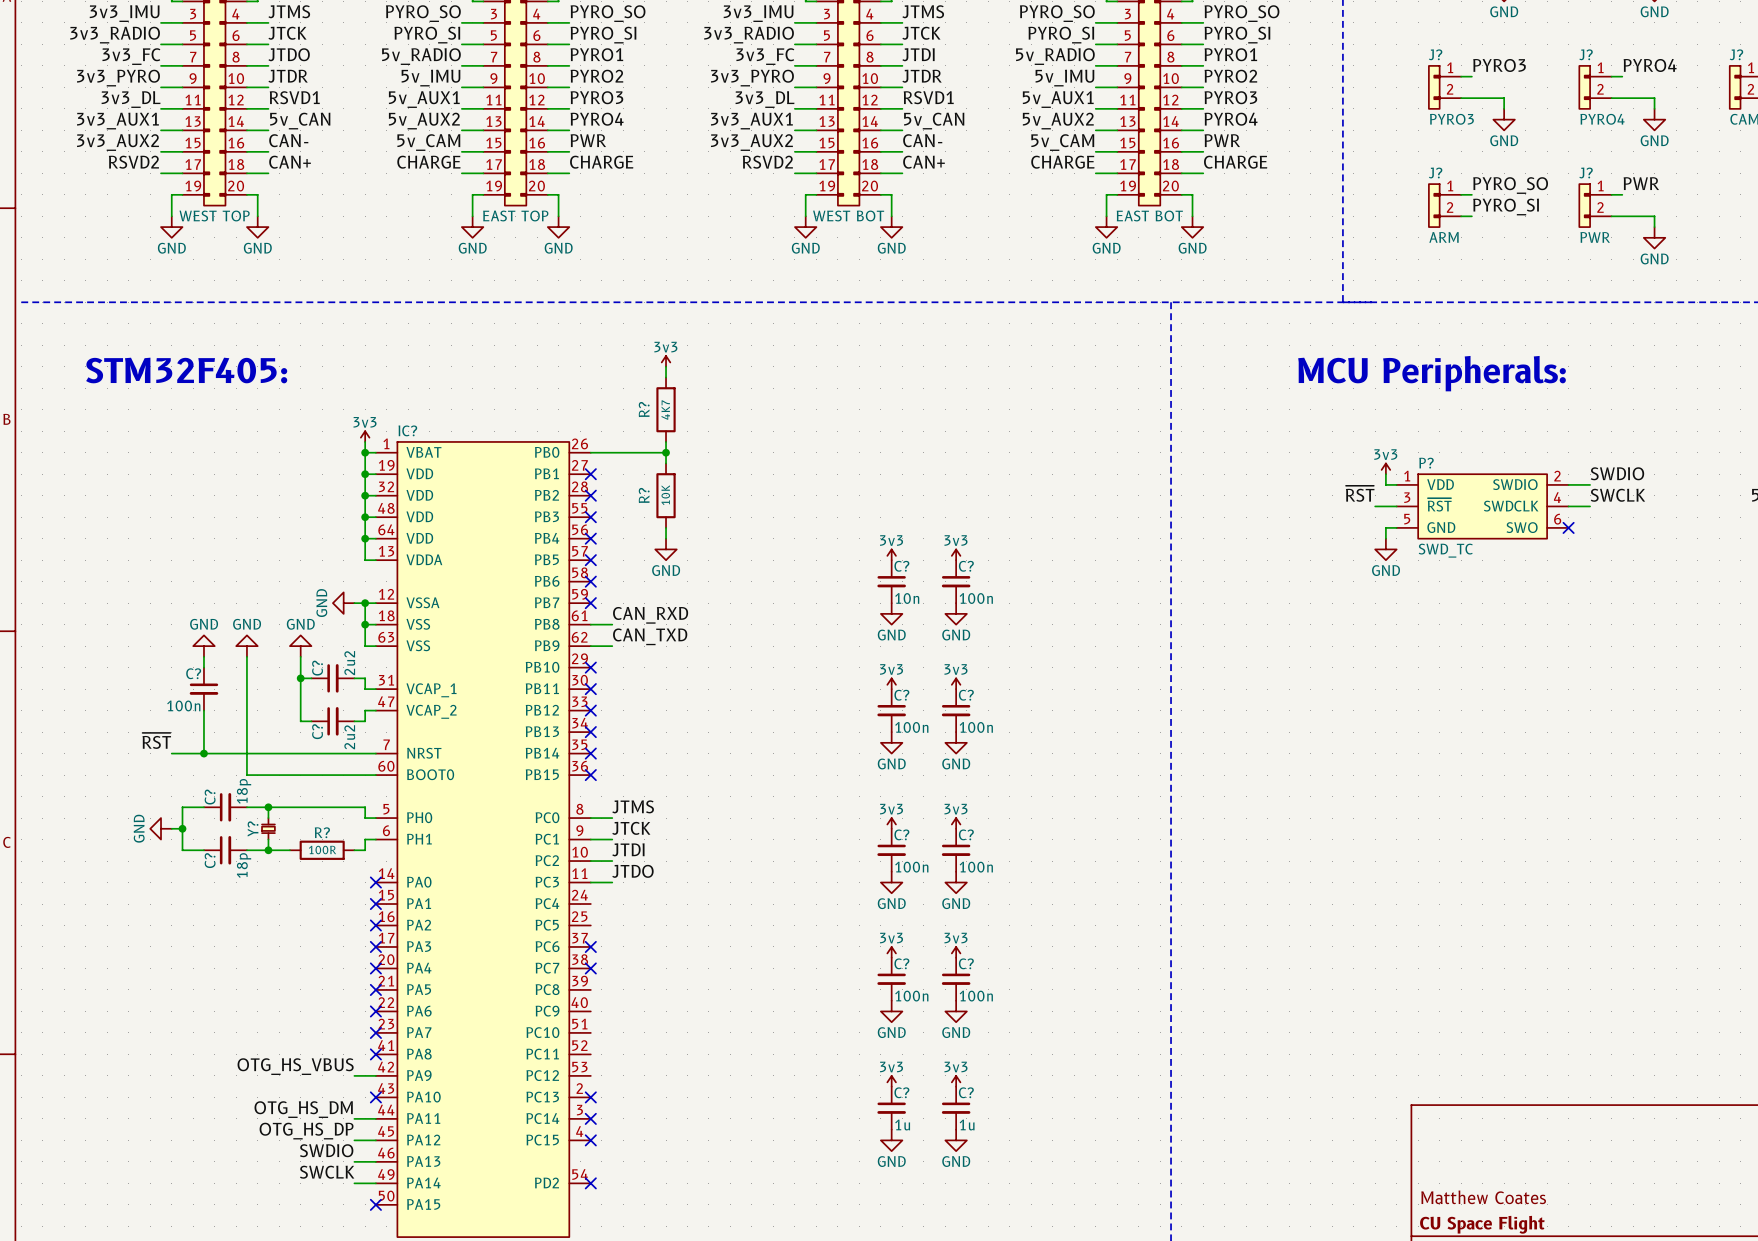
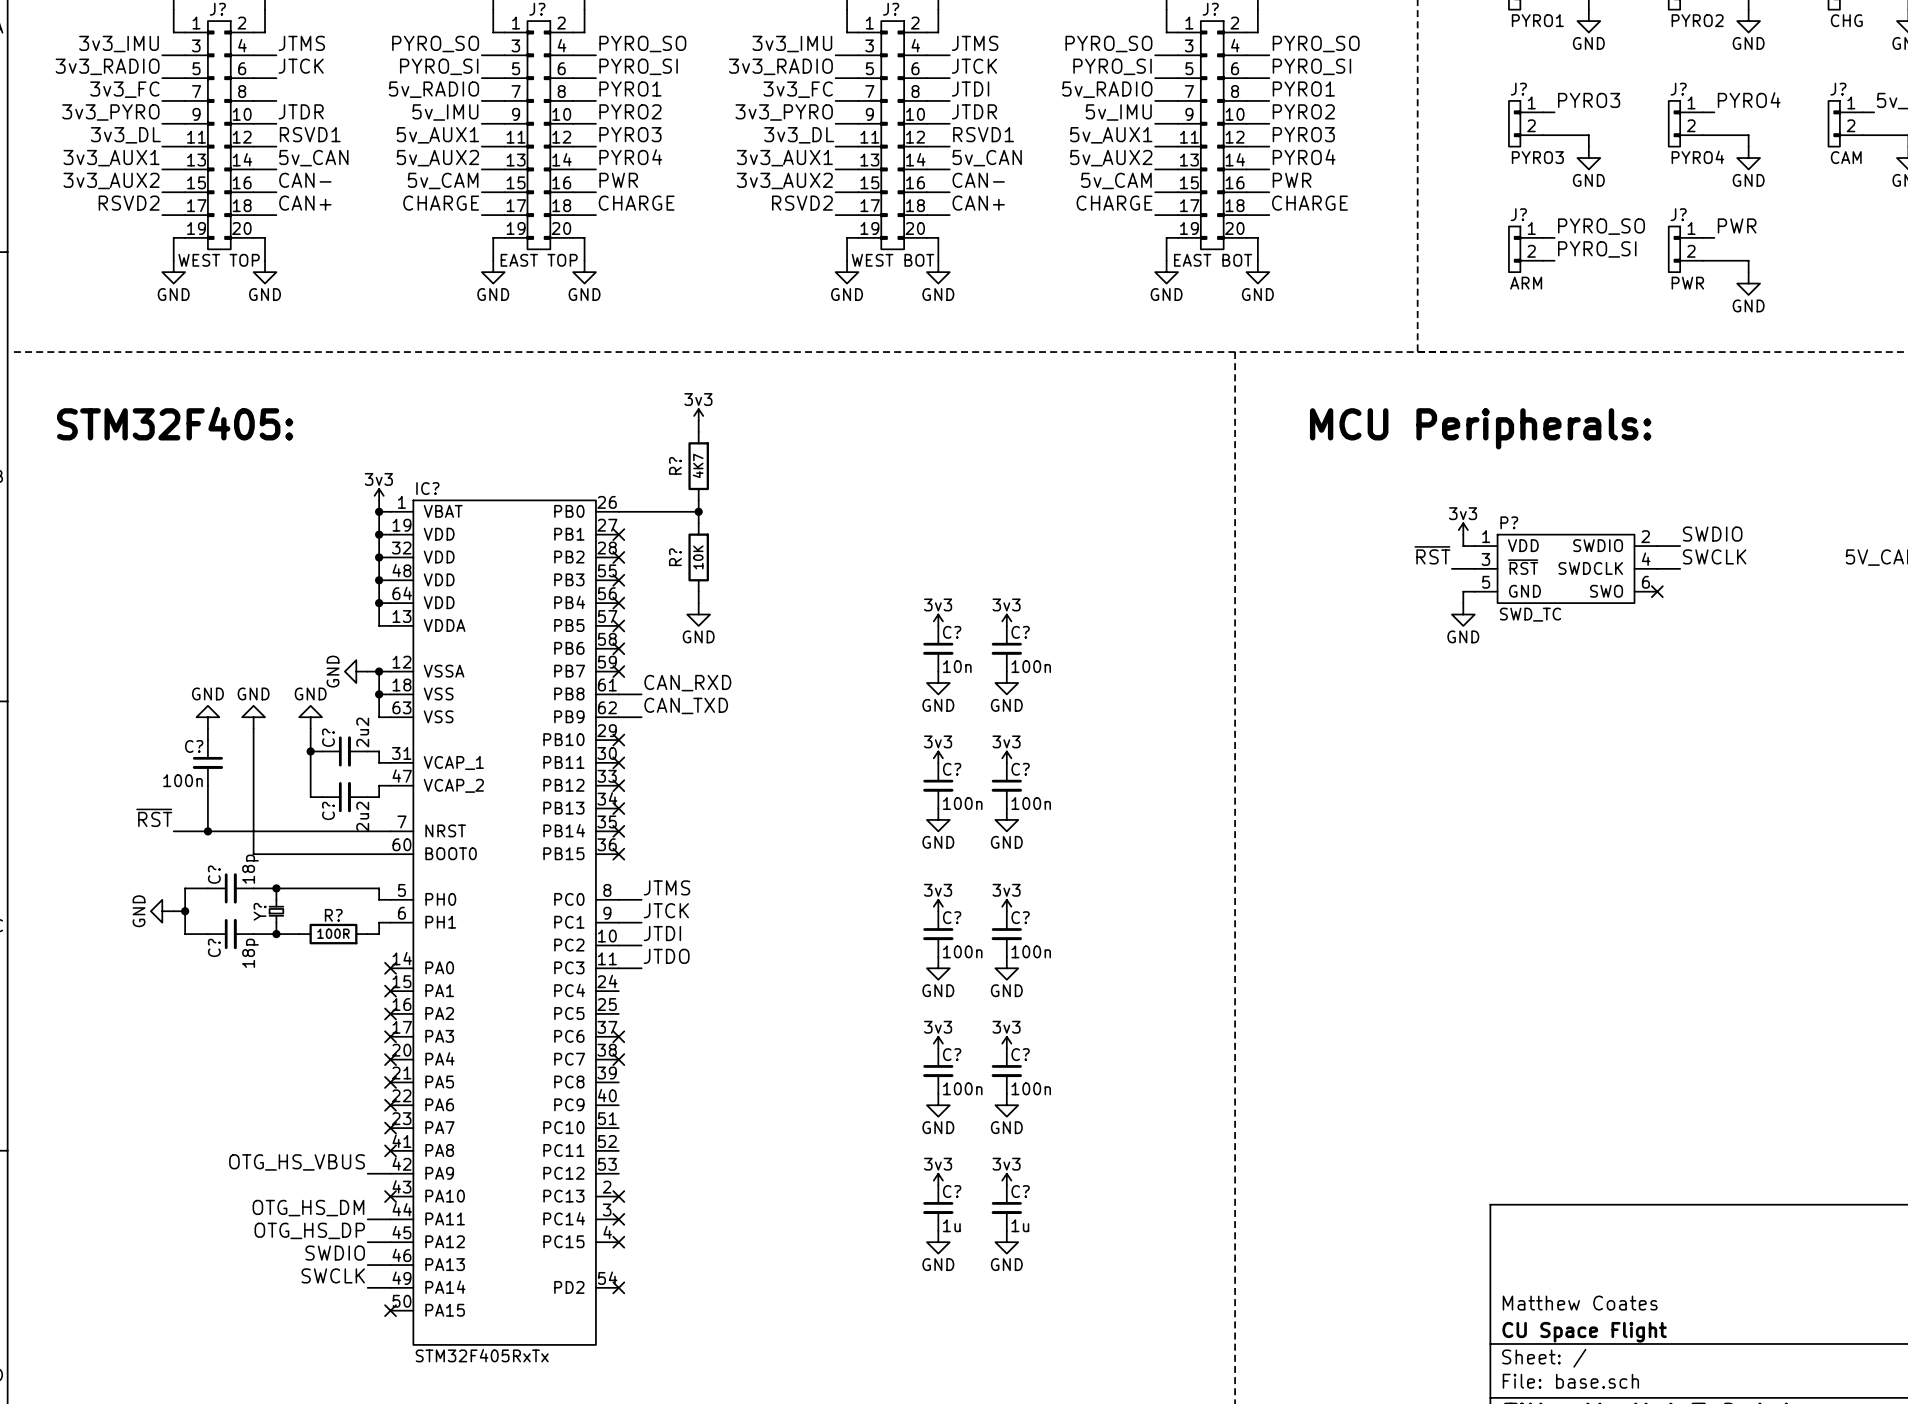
label: JTDO (289, 54) -> none

